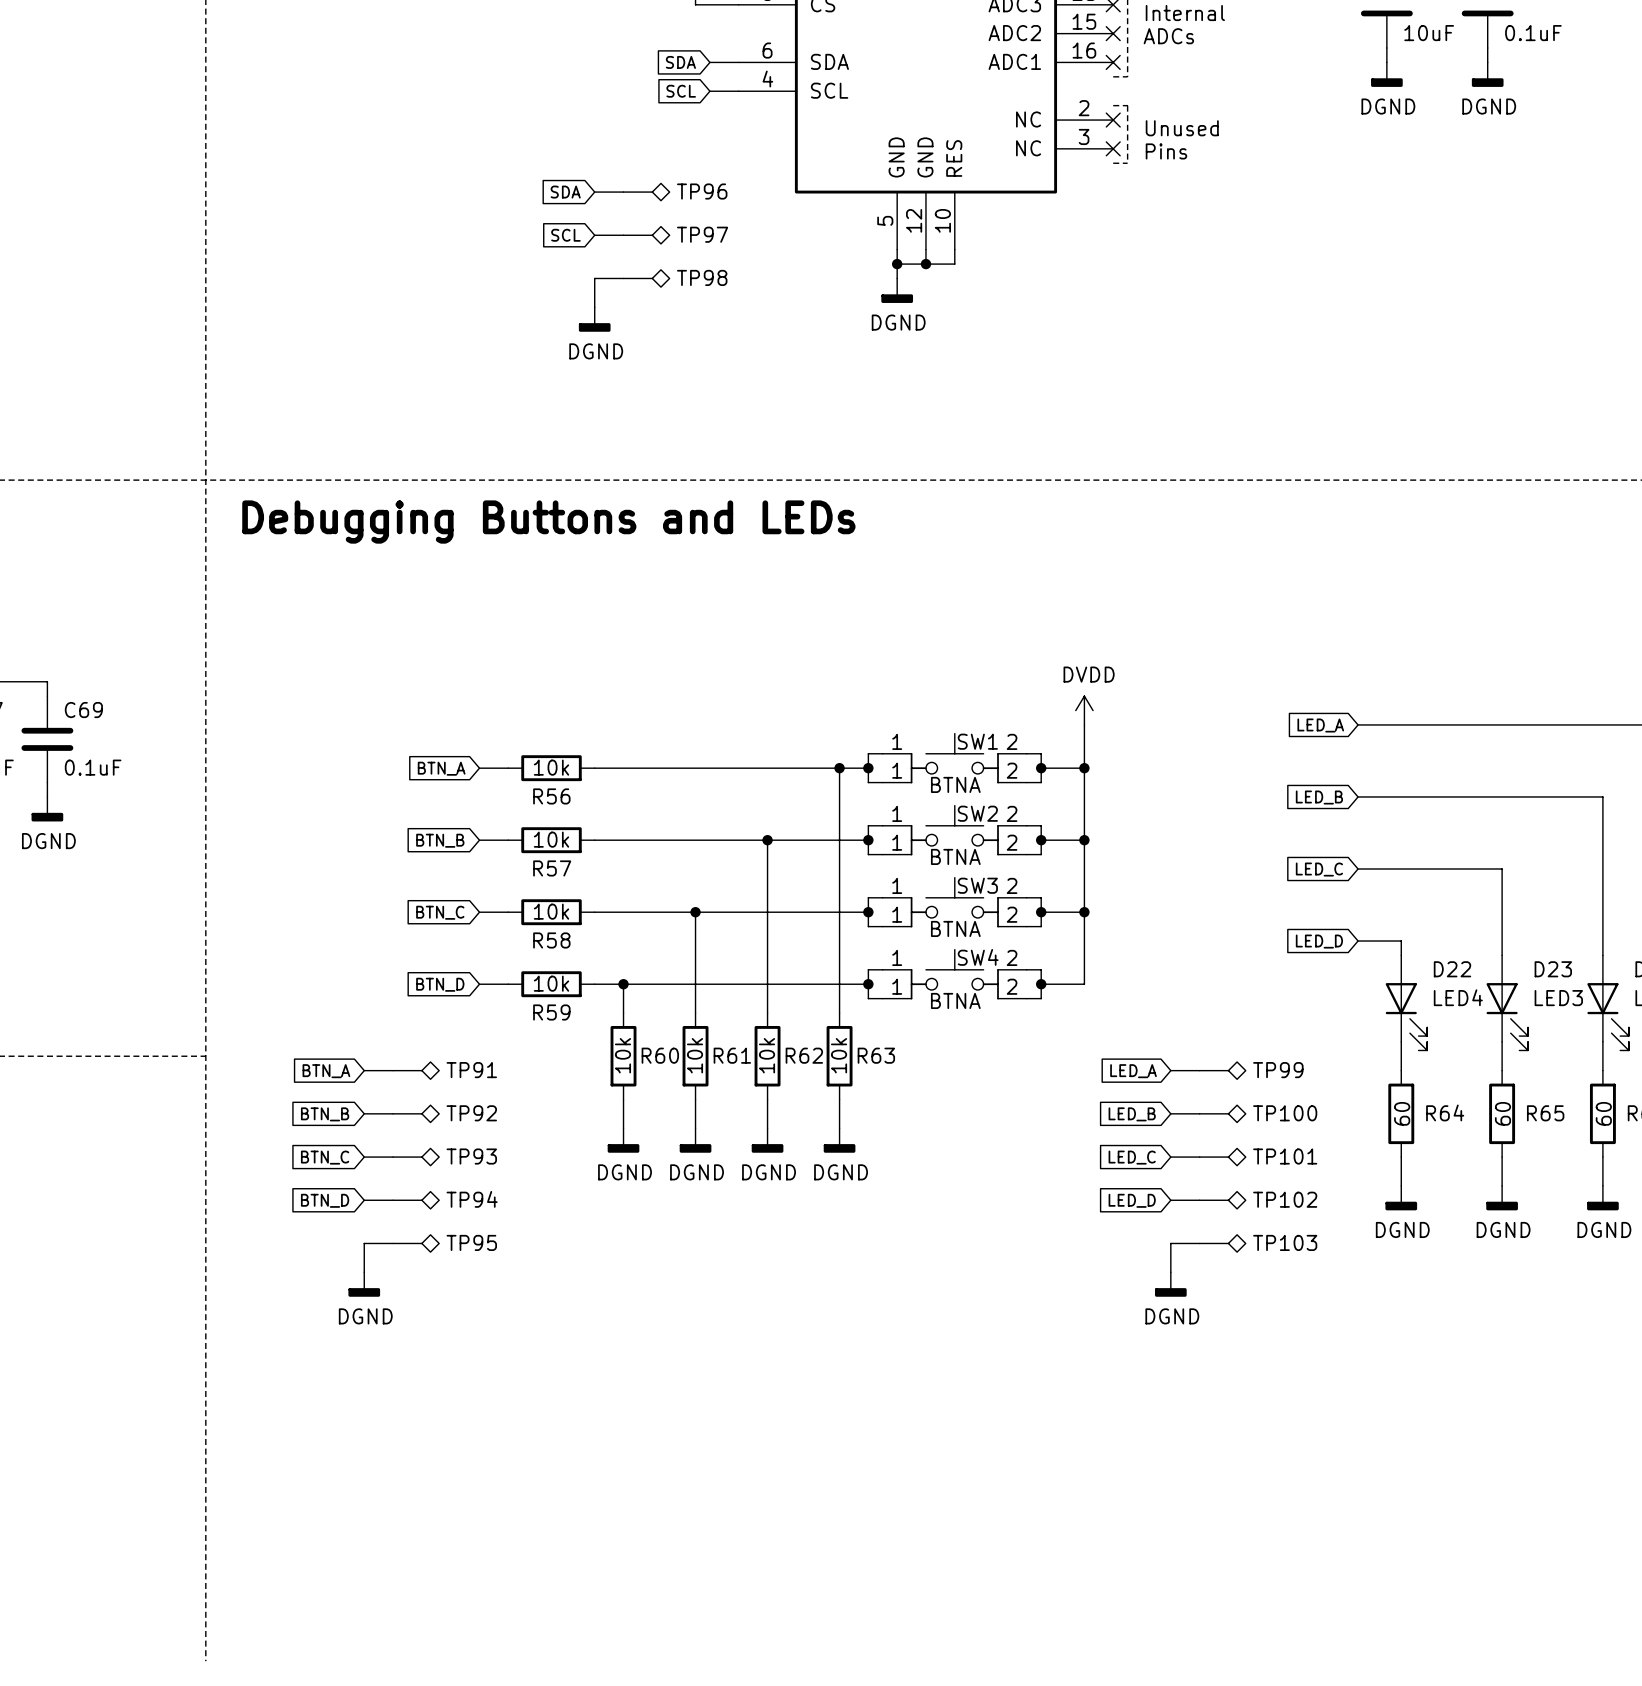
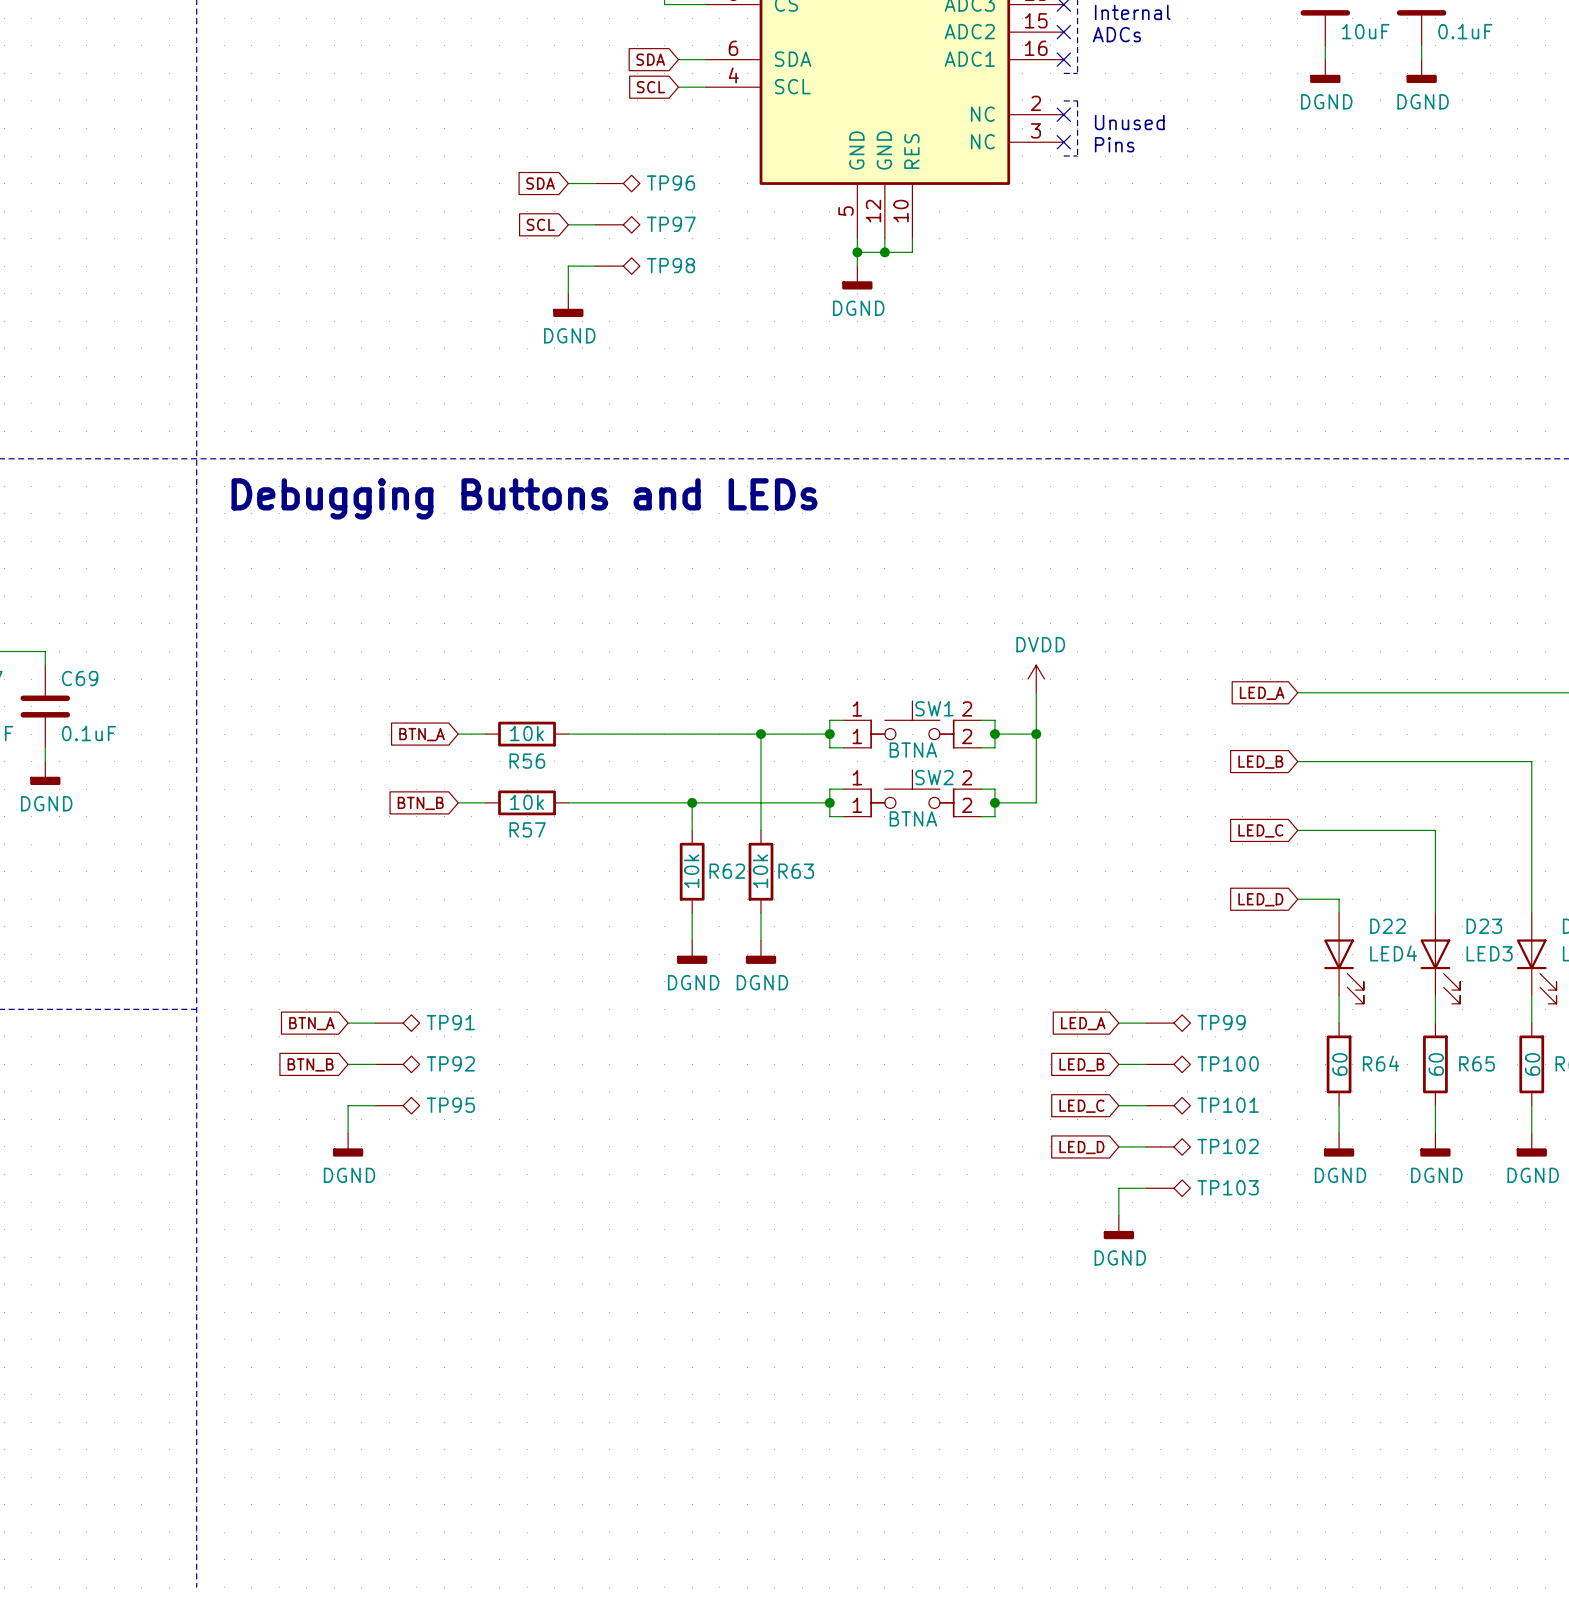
junction: none -> (761, 734)
wire: (839, 768) (839, 1013) -> none
junction: (839, 768) -> none
junction: none -> (692, 802)
wire: (767, 840) (767, 1013) -> none
junction: (767, 840) -> none
wire: (1084, 840) (1084, 984) (1041, 984) -> none
junction: (1084, 840) -> none
wire: (882, 897) (868, 897) (868, 926) (882, 926) -> none
wire: (1026, 897) (1041, 897) (1041, 926) (1026, 926) -> none
SW3: BTNA (954, 902) -> none
global label: BTN_C (440, 912) -> none
wire: (479, 912) (508, 912) -> none
R58: 10k (551, 912) -> none
wire: (594, 912) (868, 912) -> none
wire: (695, 912) (695, 1013) -> (761, 734) (761, 830)
junction: (695, 912) -> none
junction: (868, 912) -> none
wire: (1041, 912) (1084, 912) -> none
junction: (1041, 912) -> none
junction: (1084, 912) -> none
wire: (882, 969) (868, 969) (868, 998) (882, 998) -> none
wire: (1026, 969) (1041, 969) (1041, 998) (1026, 998) -> none
SW4: BTNA (954, 974) -> none
global label: BTN_D (440, 984) -> none
wire: (479, 984) (508, 984) -> none
R59: 10k (551, 984) -> none
wire: (594, 984) (868, 984) -> none
wire: (623, 984) (623, 1013) -> (692, 802) (692, 830)
junction: (623, 984) -> none
junction: (868, 984) -> none
junction: (1041, 984) -> none
power symbol: none -> DGND (692, 952)
power symbol: none -> DGND (761, 952)
R60: 10k (623, 1056) -> none
R61: 10k (695, 1056) -> none
R62 position: (767, 1056) -> (692, 871)
R63 position: (839, 1056) -> (761, 871)
wire: (623, 1099) (623, 1128) -> (692, 913) (692, 940)
wire: (695, 1099) (695, 1128) -> (761, 913) (761, 940)
wire: (767, 1099) (767, 1128) -> none
wire: (839, 1099) (839, 1128) -> none
power symbol: DGND (623, 1140) -> none
power symbol: DGND (695, 1140) -> none
power symbol: DGND (767, 1140) -> none
power symbol: DGND (839, 1140) -> none
TP93 name: TP93 (471, 1156) -> TP95 (450, 1105)
global label: BTN_C (325, 1157) -> none
wire: none -> (348, 1105) (348, 1133)
global label: BTN_D (325, 1200) -> none
wire: (364, 1200) (393, 1200) -> none
TP94: (416, 1200) -> none
wire: (393, 1243) (364, 1243) (364, 1272) -> none
TP95: (416, 1243) -> none
power symbol position: DGND (364, 1284) -> DGND (348, 1144)

